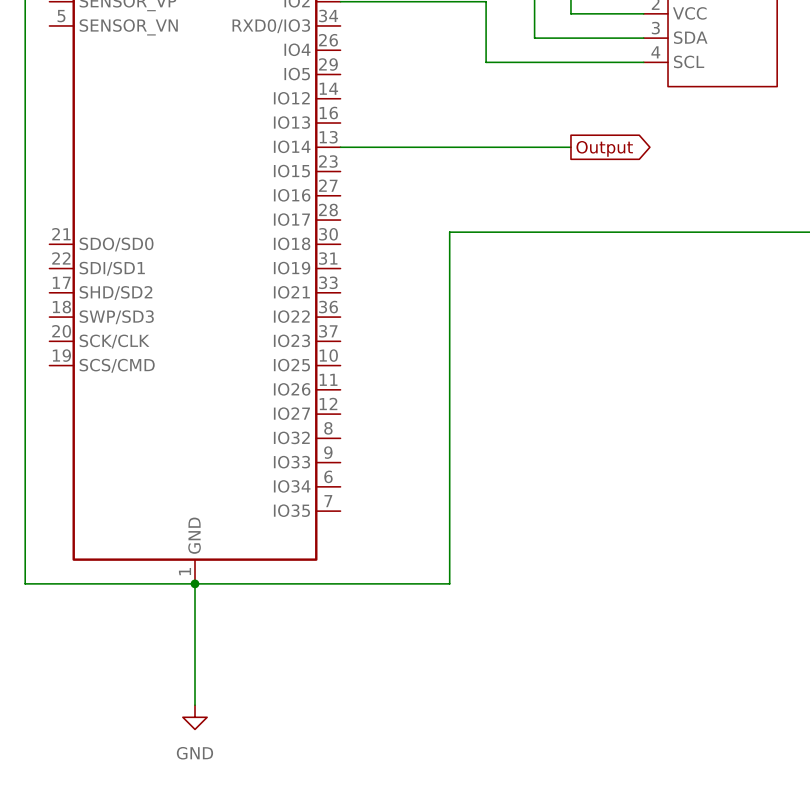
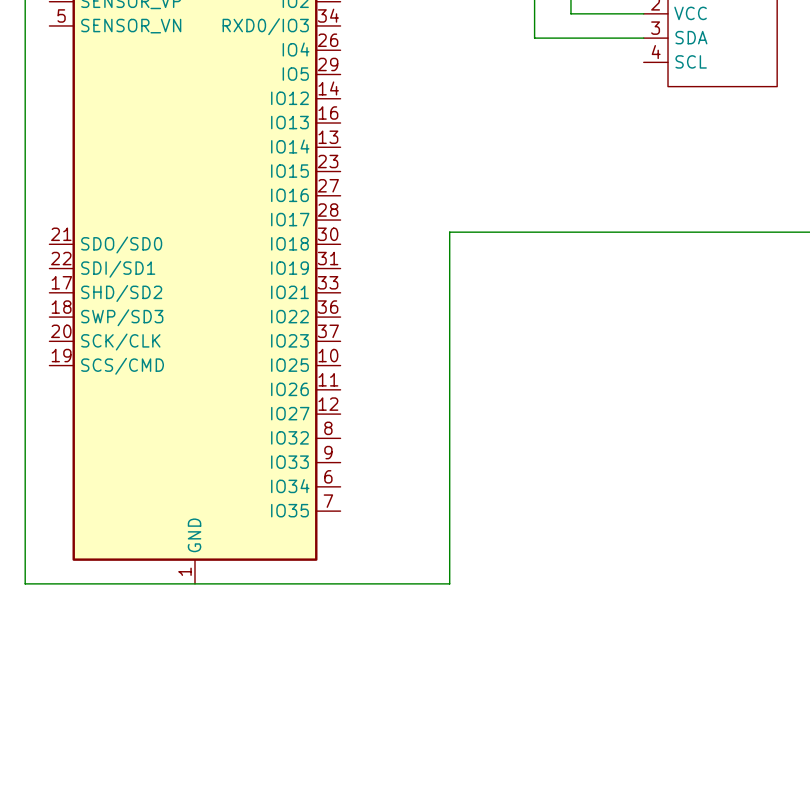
wire: (340, 1) (486, 1) (486, 62) (643, 62) -> none
wire: (340, 147) (570, 147) -> none
global label: Output (604, 148) -> none
wire: (195, 583) (195, 705) -> none
junction: (195, 583) -> none
power symbol: GND (195, 717) -> none

